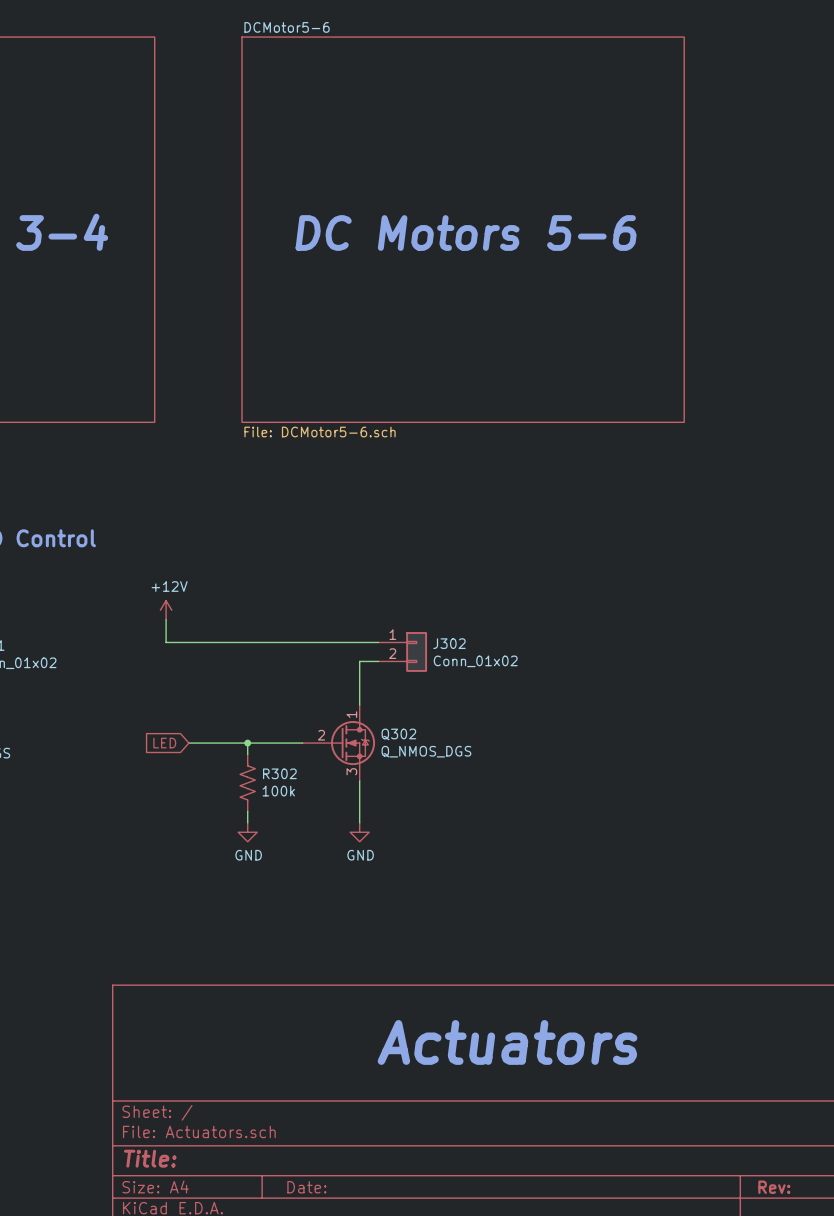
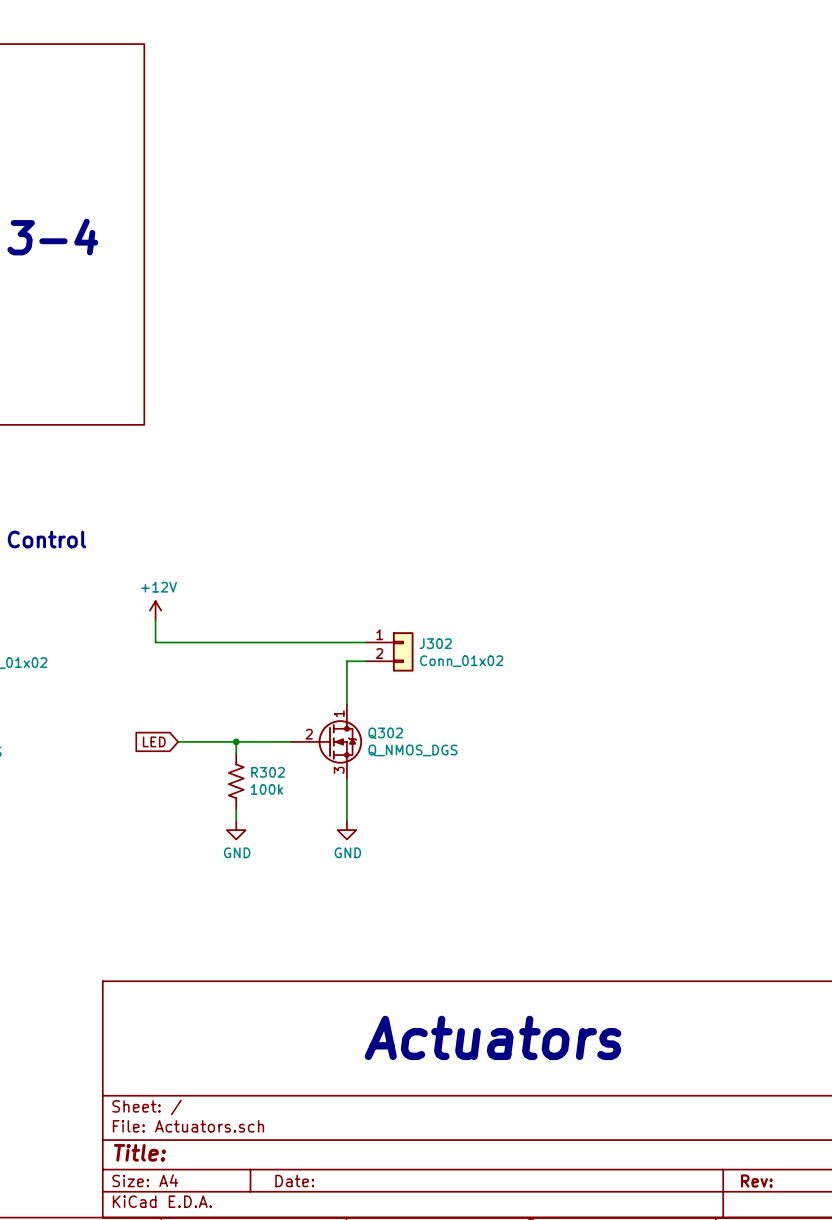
sheet DCMotor5-6: File: DCMotor5-6.sch (463, 229) -> none
text: DC Motors 5-6 (466, 233) -> none

